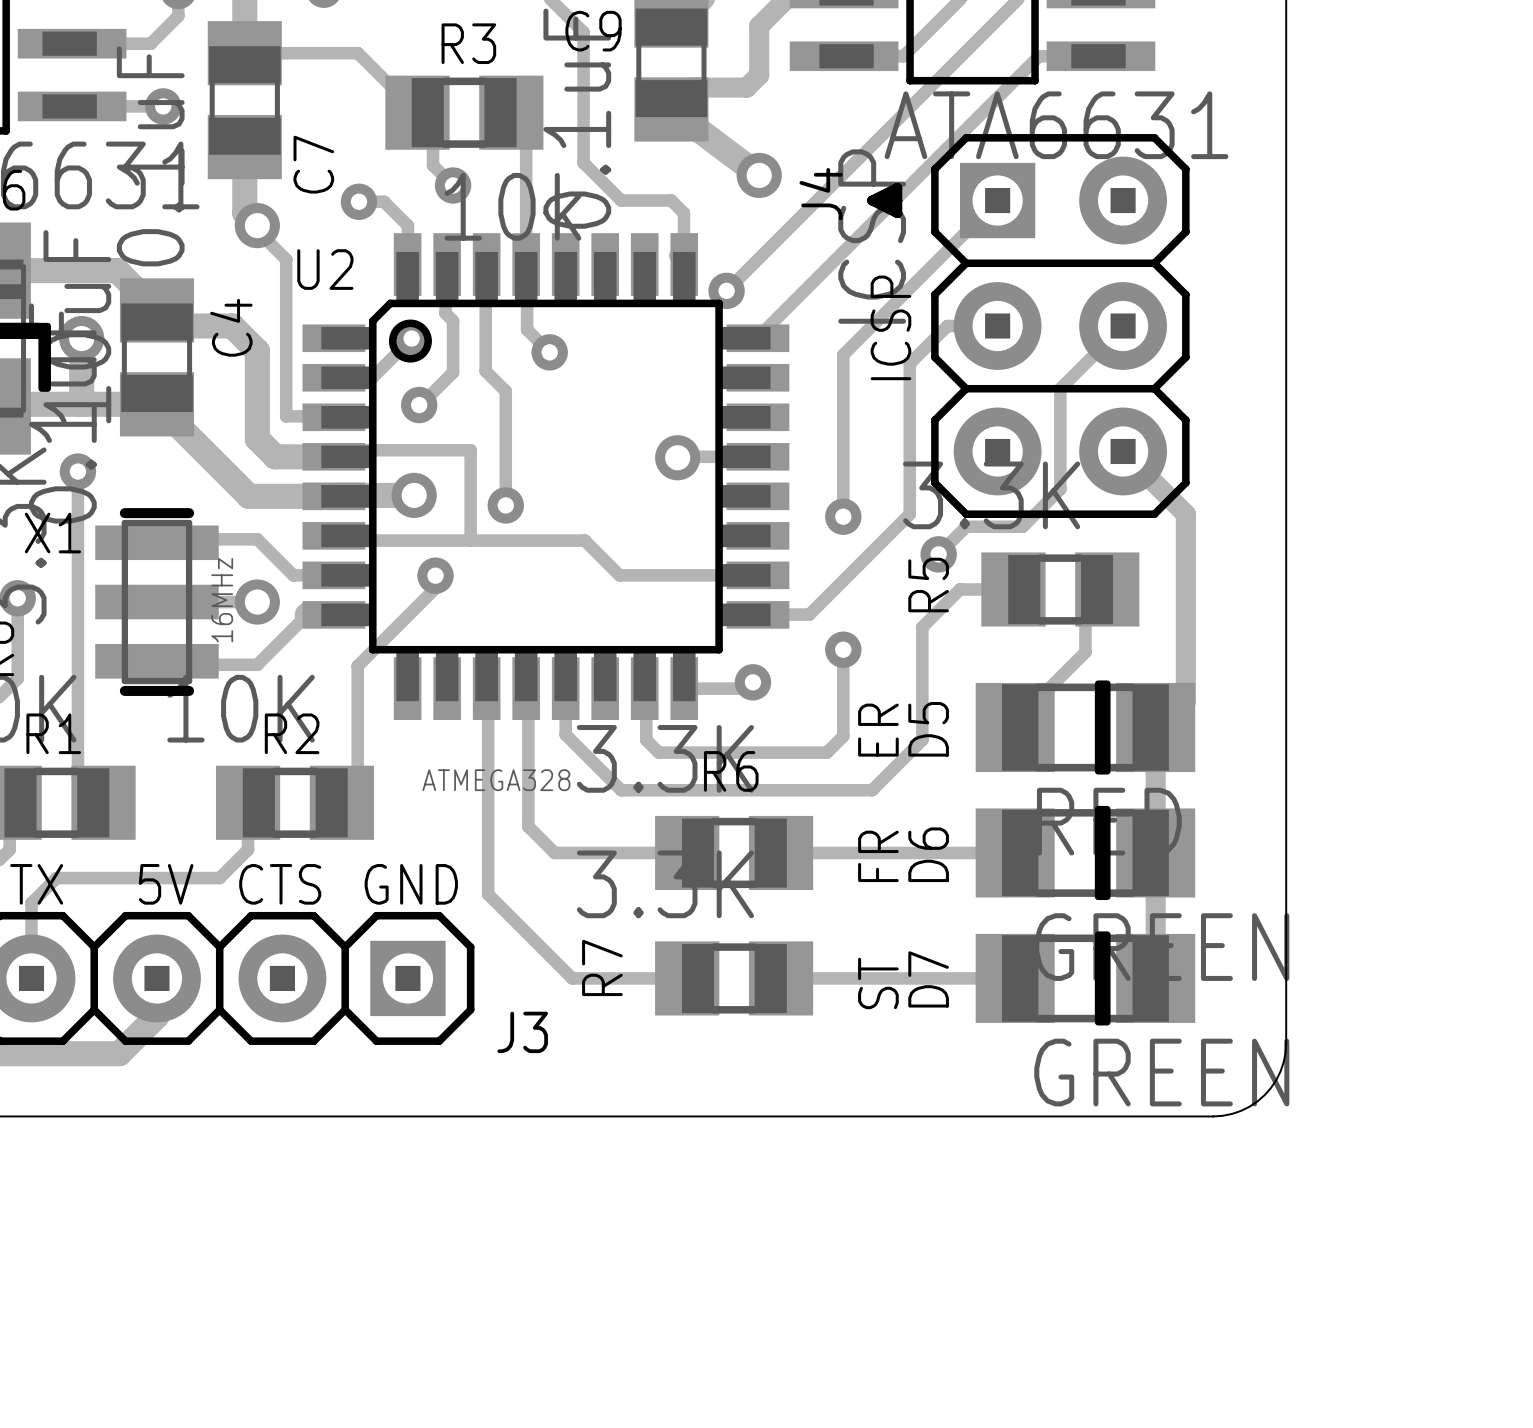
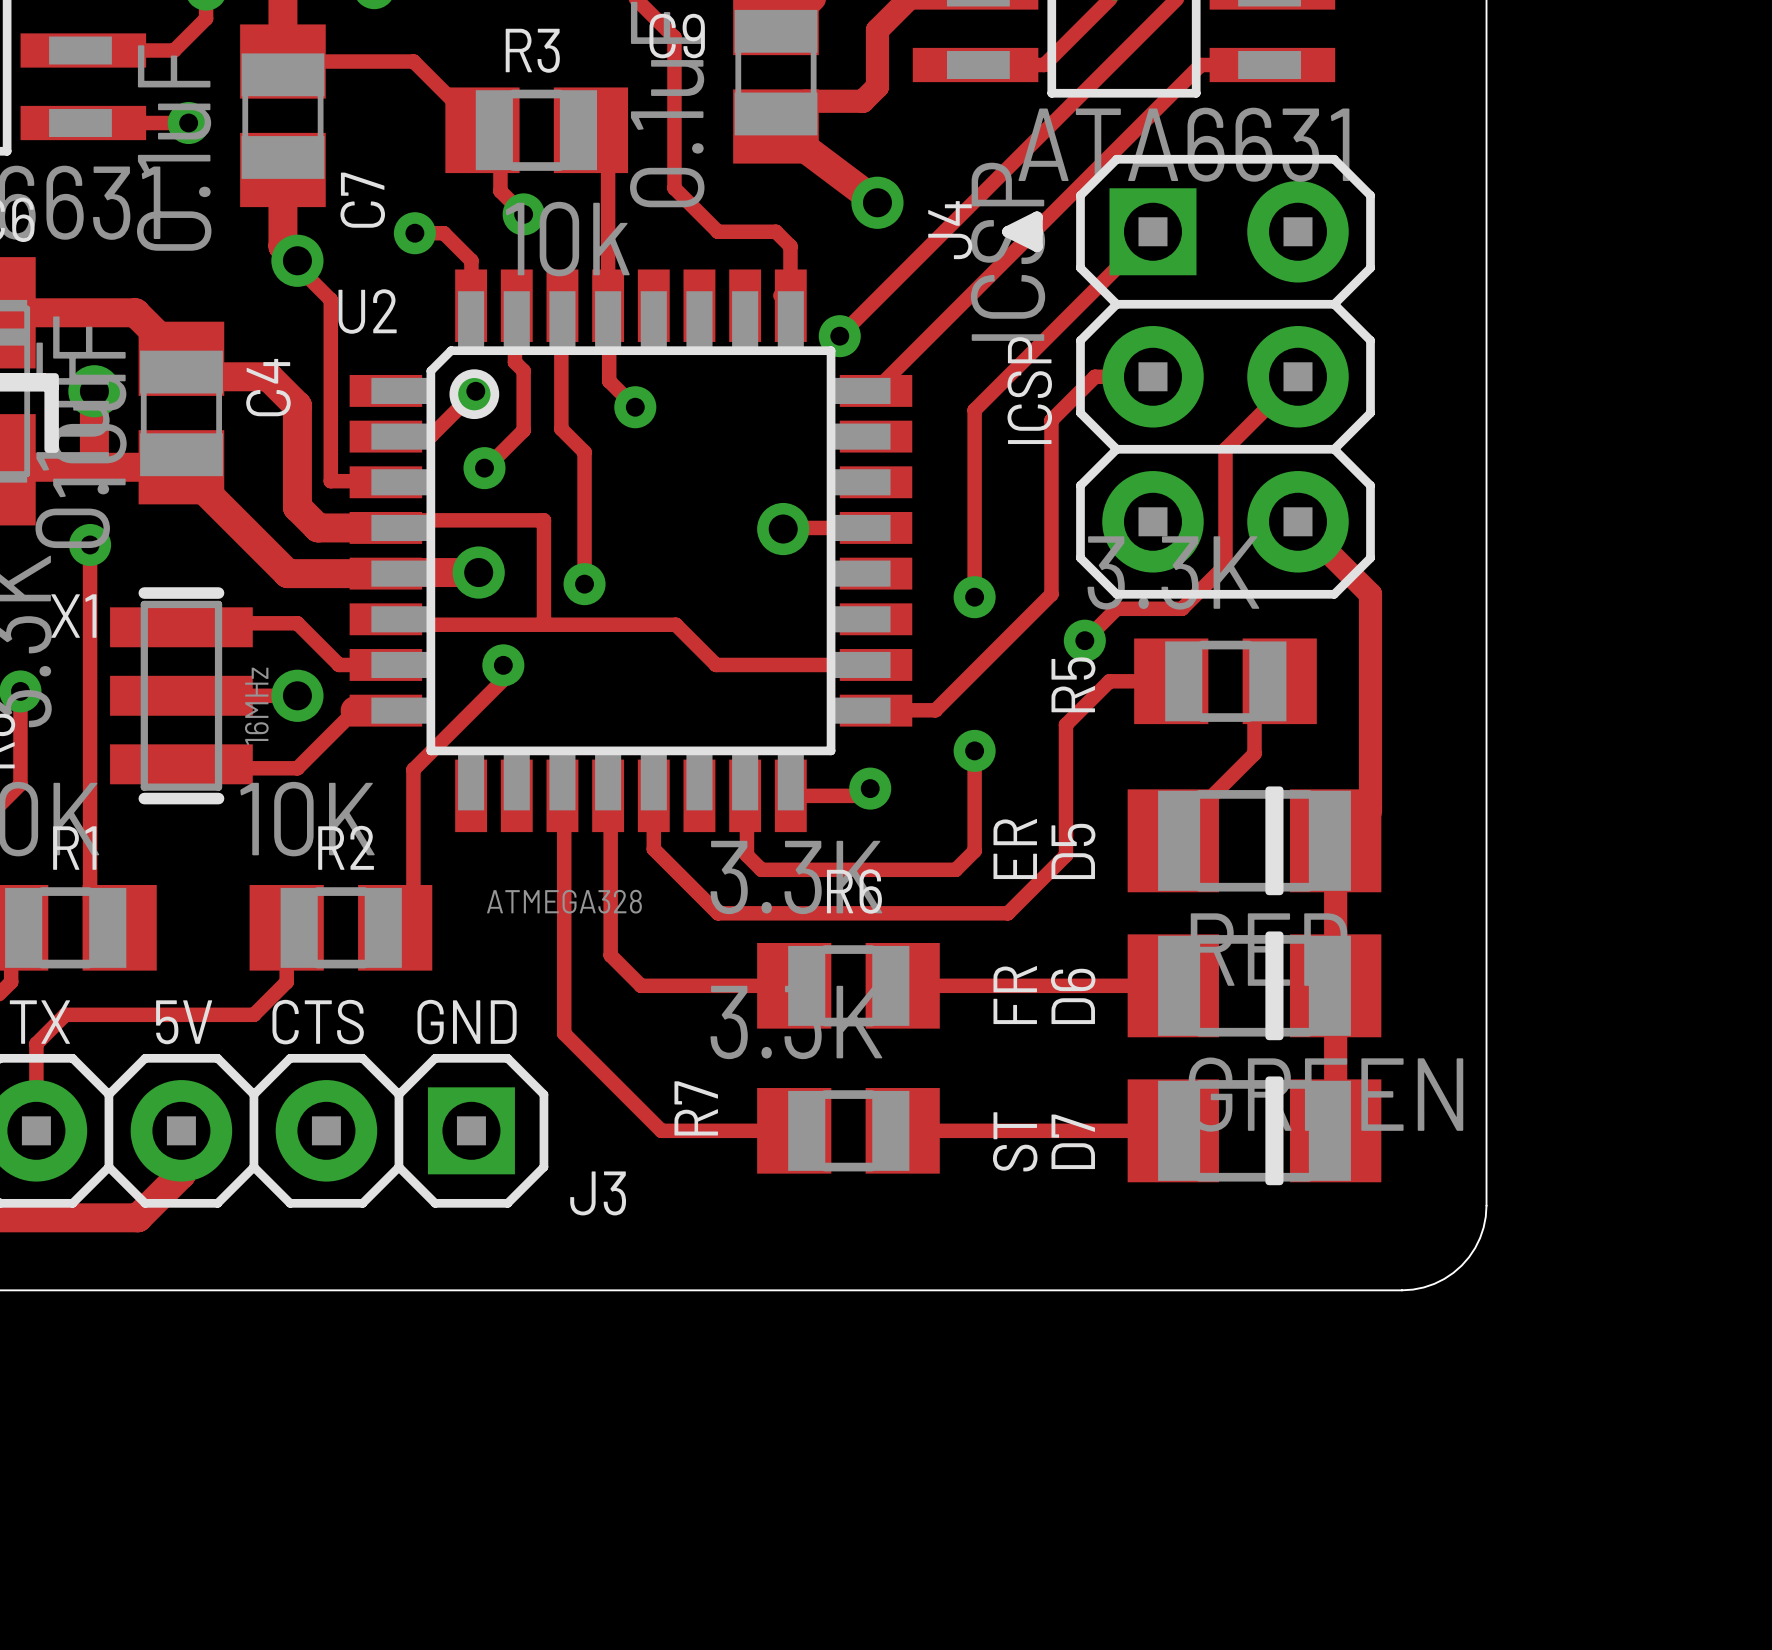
D7 value: GREEN (1161, 1072) -> none

